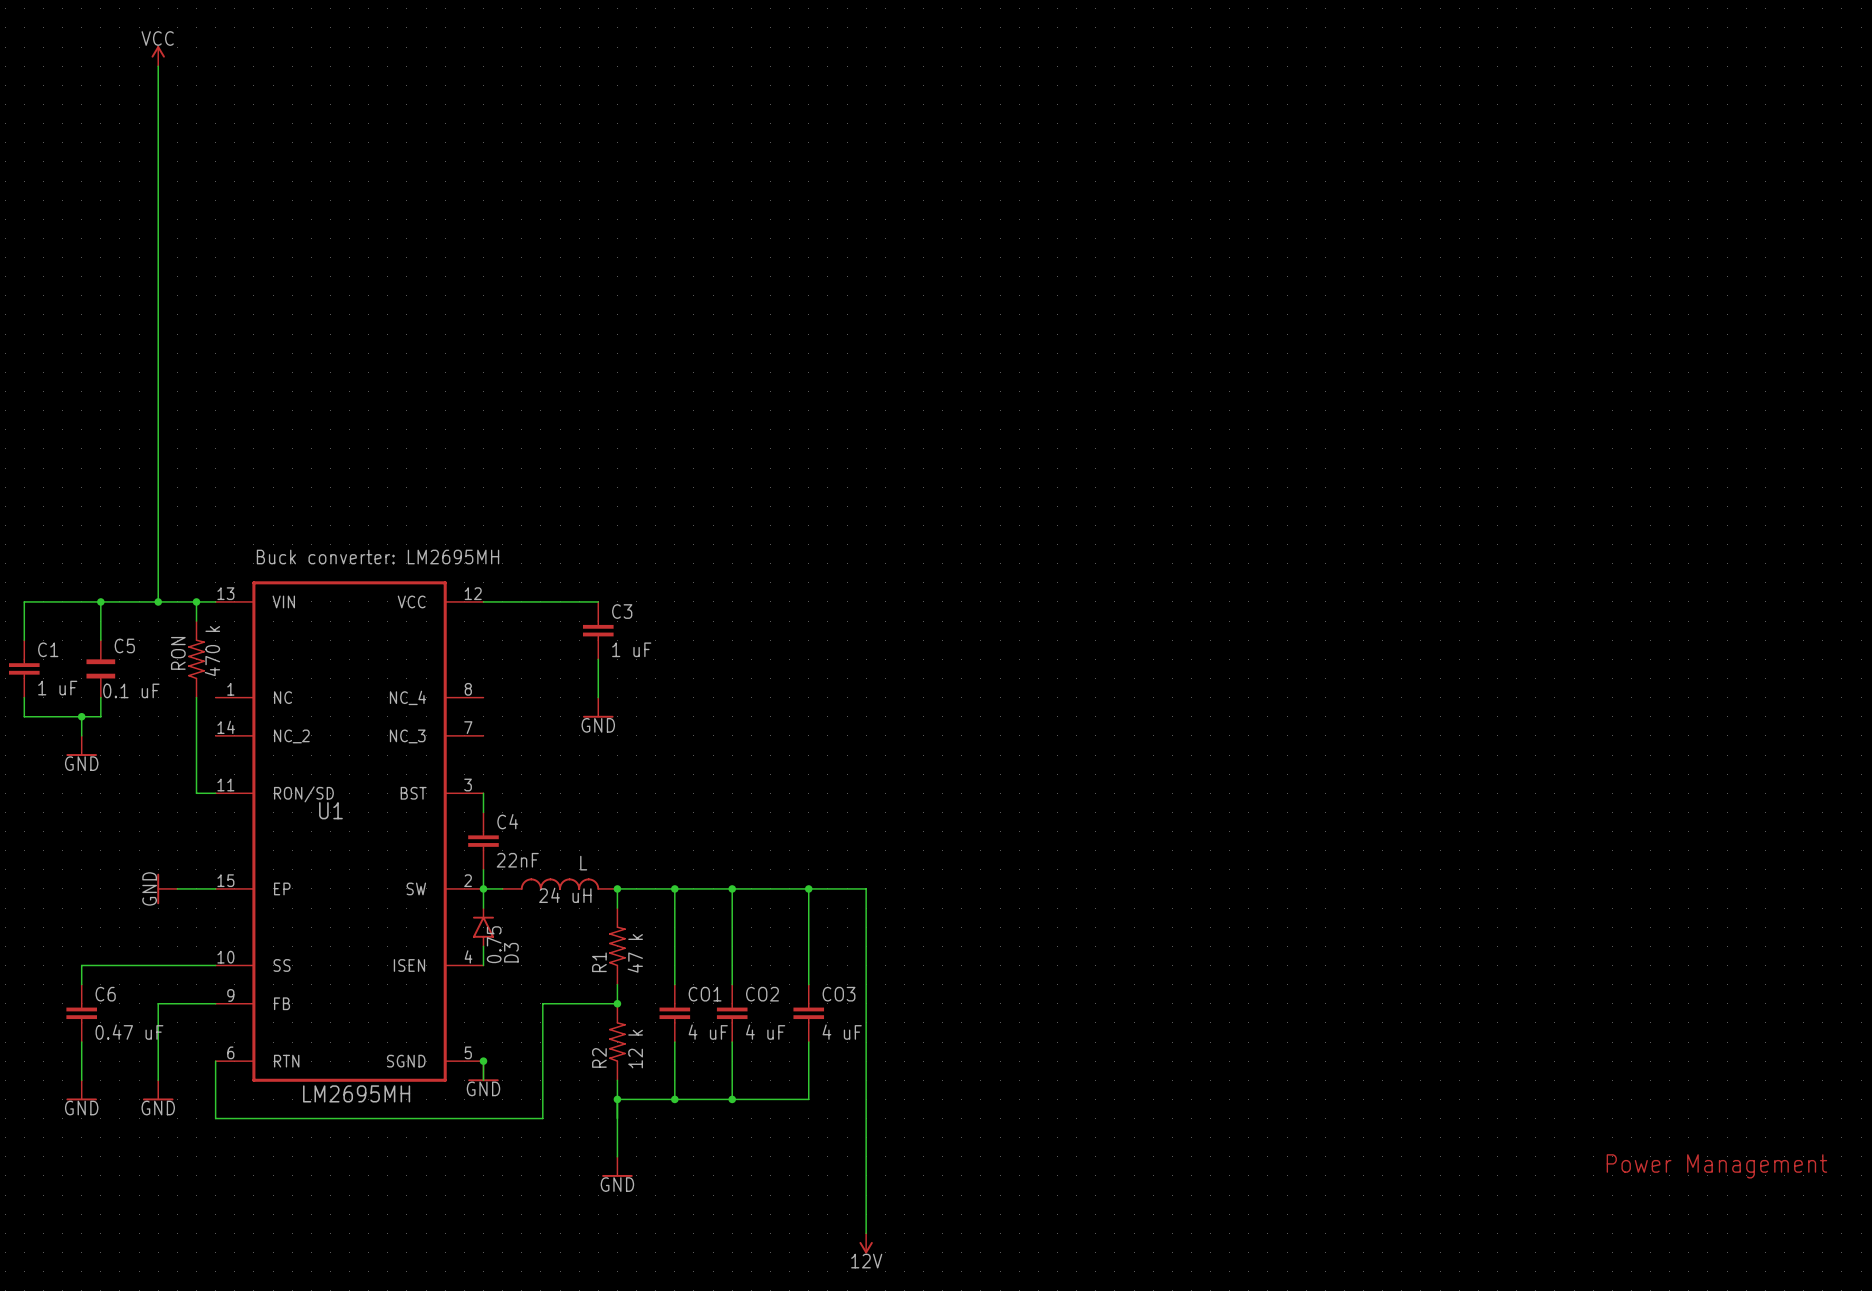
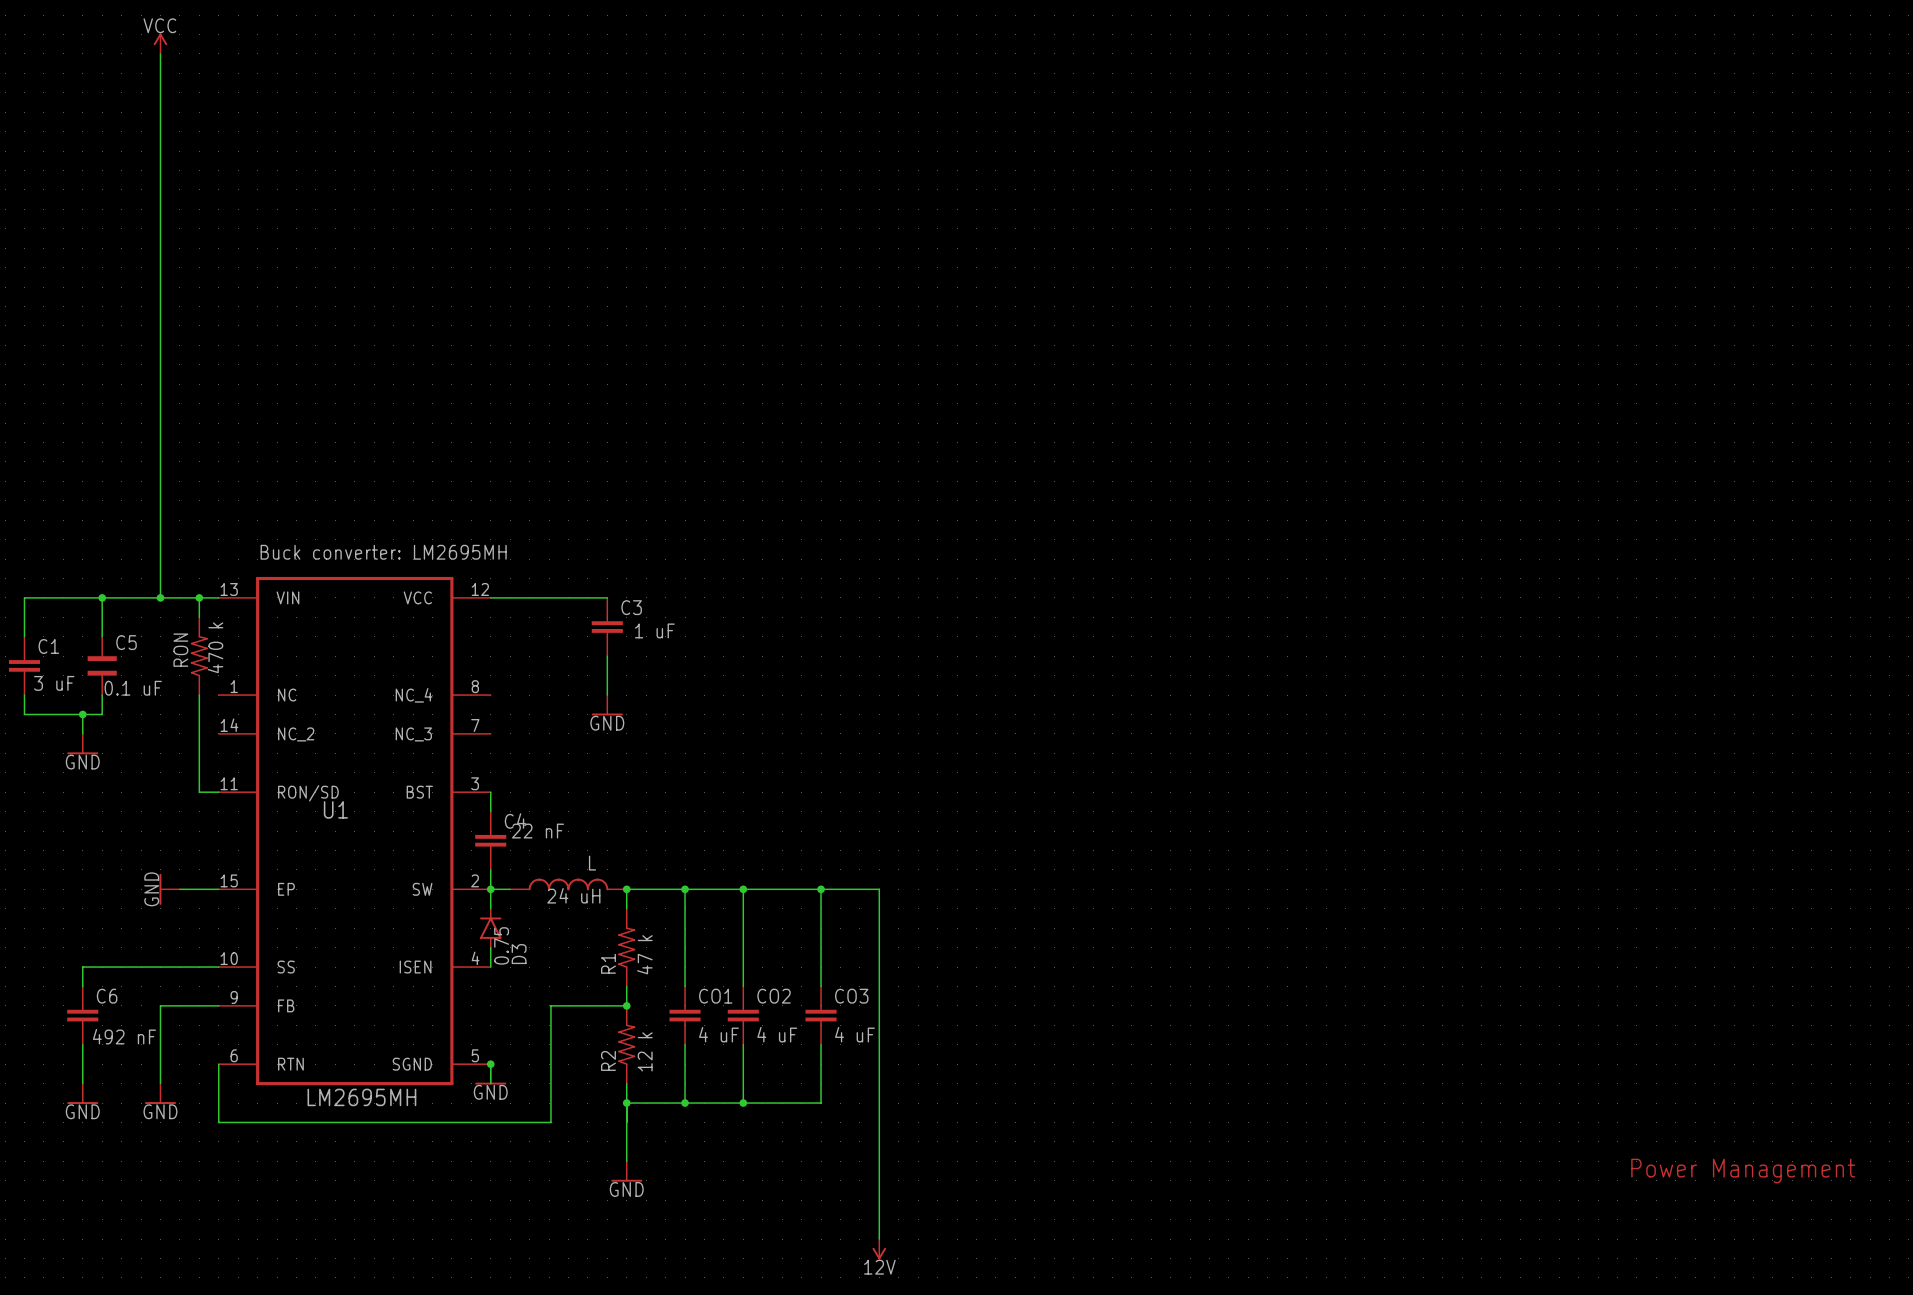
C3 value position: 1 uF (631, 649) -> 1 uF (654, 630)
C1 value: 1 uF (57, 688) -> 3 uF (54, 683)
C4 value: 22nF (517, 860) -> 22 nF (537, 831)
C6 value: 0.47 uF (129, 1032) -> 492 nF (124, 1036)

